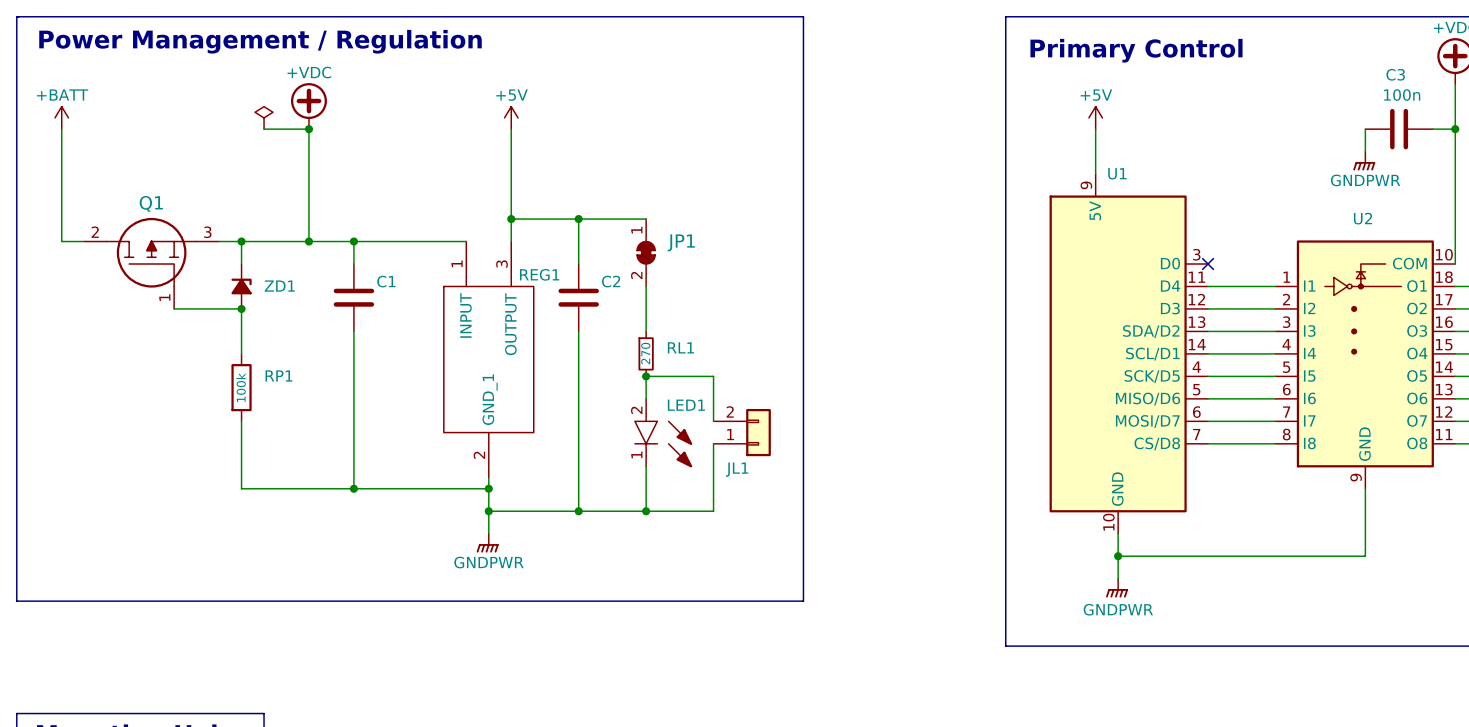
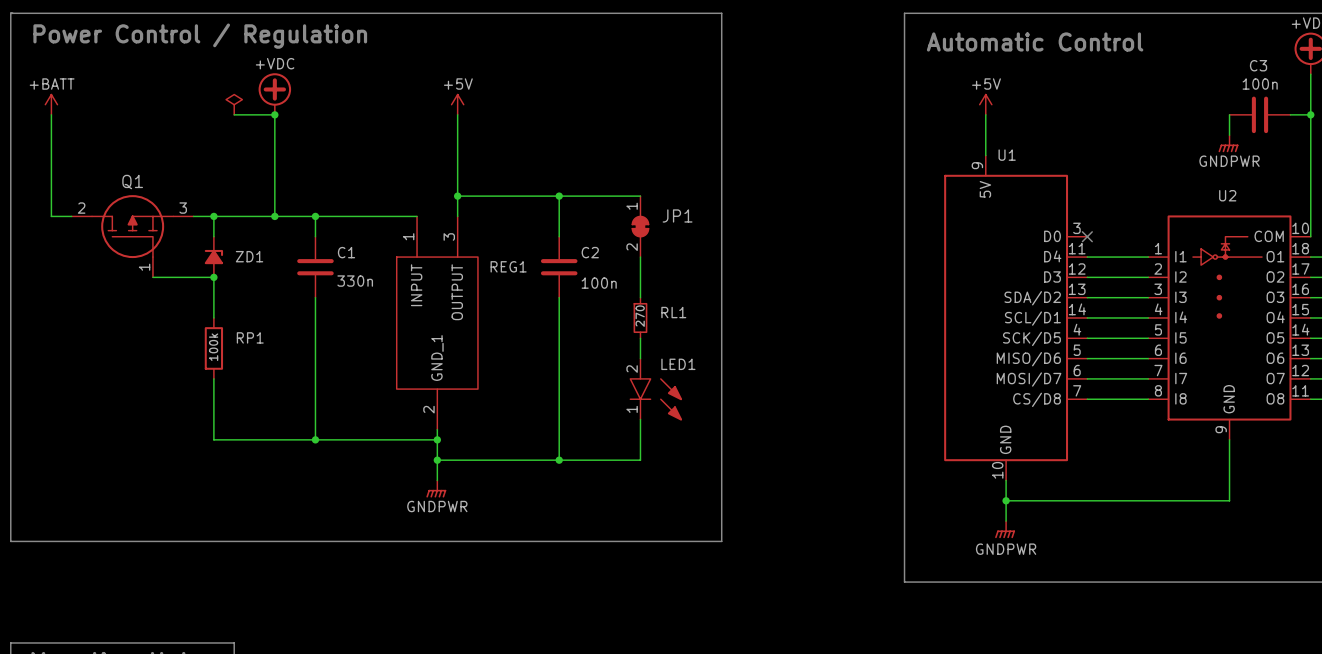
text: Power Management / Regulation (260, 41) -> Power Control / Regulation (200, 36)
text: Primary Control (1136, 50) -> Automatic Control (1035, 41)
wire: (578, 219) (578, 264) -> (559, 196) (559, 236)
junction position: (578, 219) -> (559, 196)
wire: none -> (579, 196) (640, 196)
JP1 position: (646, 252) -> (640, 226)
REG1 name position: REG1 (539, 274) -> REG1 (508, 266)
wire: (646, 286) (646, 331) -> (640, 257) (640, 297)
C2 position: (578, 297) -> (559, 267)
C1 value: none -> 330n (355, 281)
C2 value: none -> 100n (599, 283)
wire: (578, 331) (578, 511) -> (559, 297) (559, 460)
RL1 position: (646, 353) -> (640, 317)
junction: (646, 376) -> none
wire: (713, 376) (646, 376) (646, 398) -> none
JL1: (742, 432) -> none
LED1 position: (663, 433) -> (655, 389)
wire: (646, 466) (646, 511) -> none
junction: (578, 511) -> none
junction: none -> (559, 460)
junction: (646, 511) -> none

